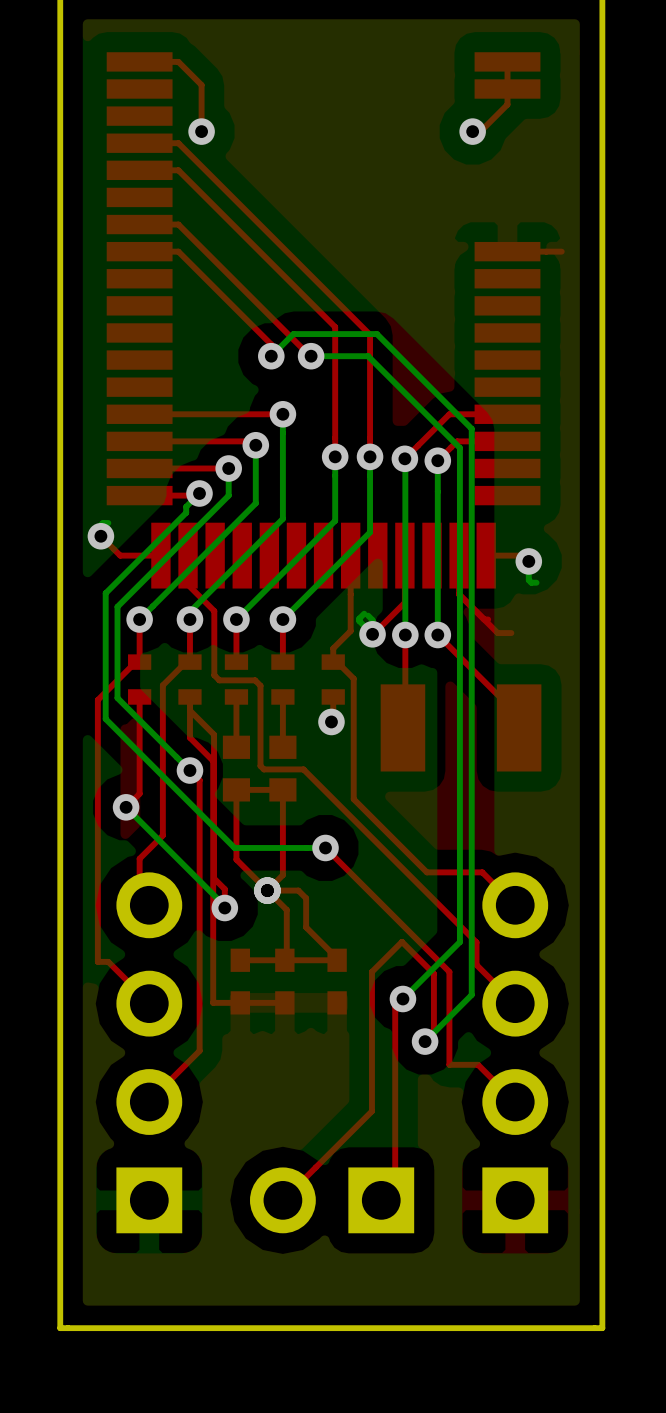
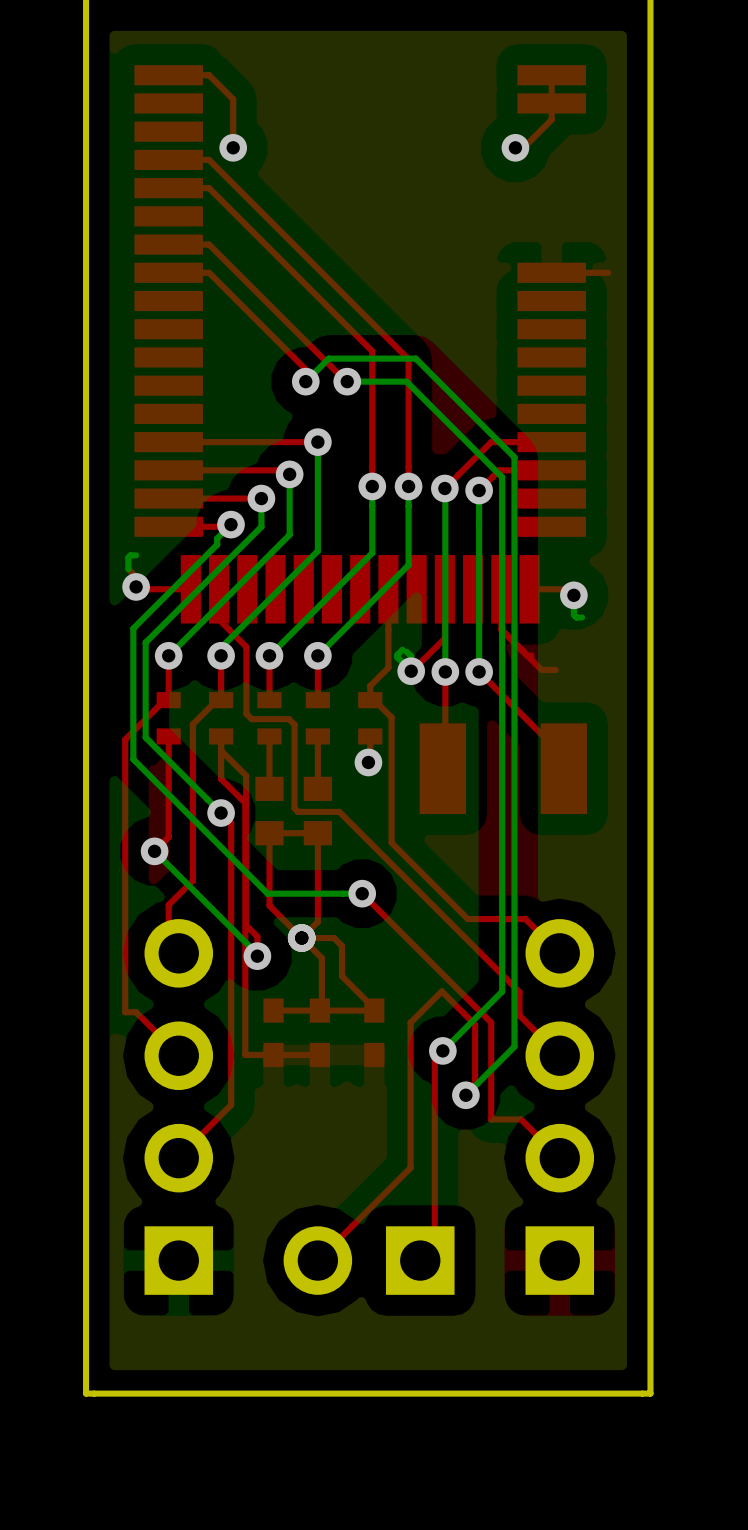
via position: (100, 536) -> (136, 586)

